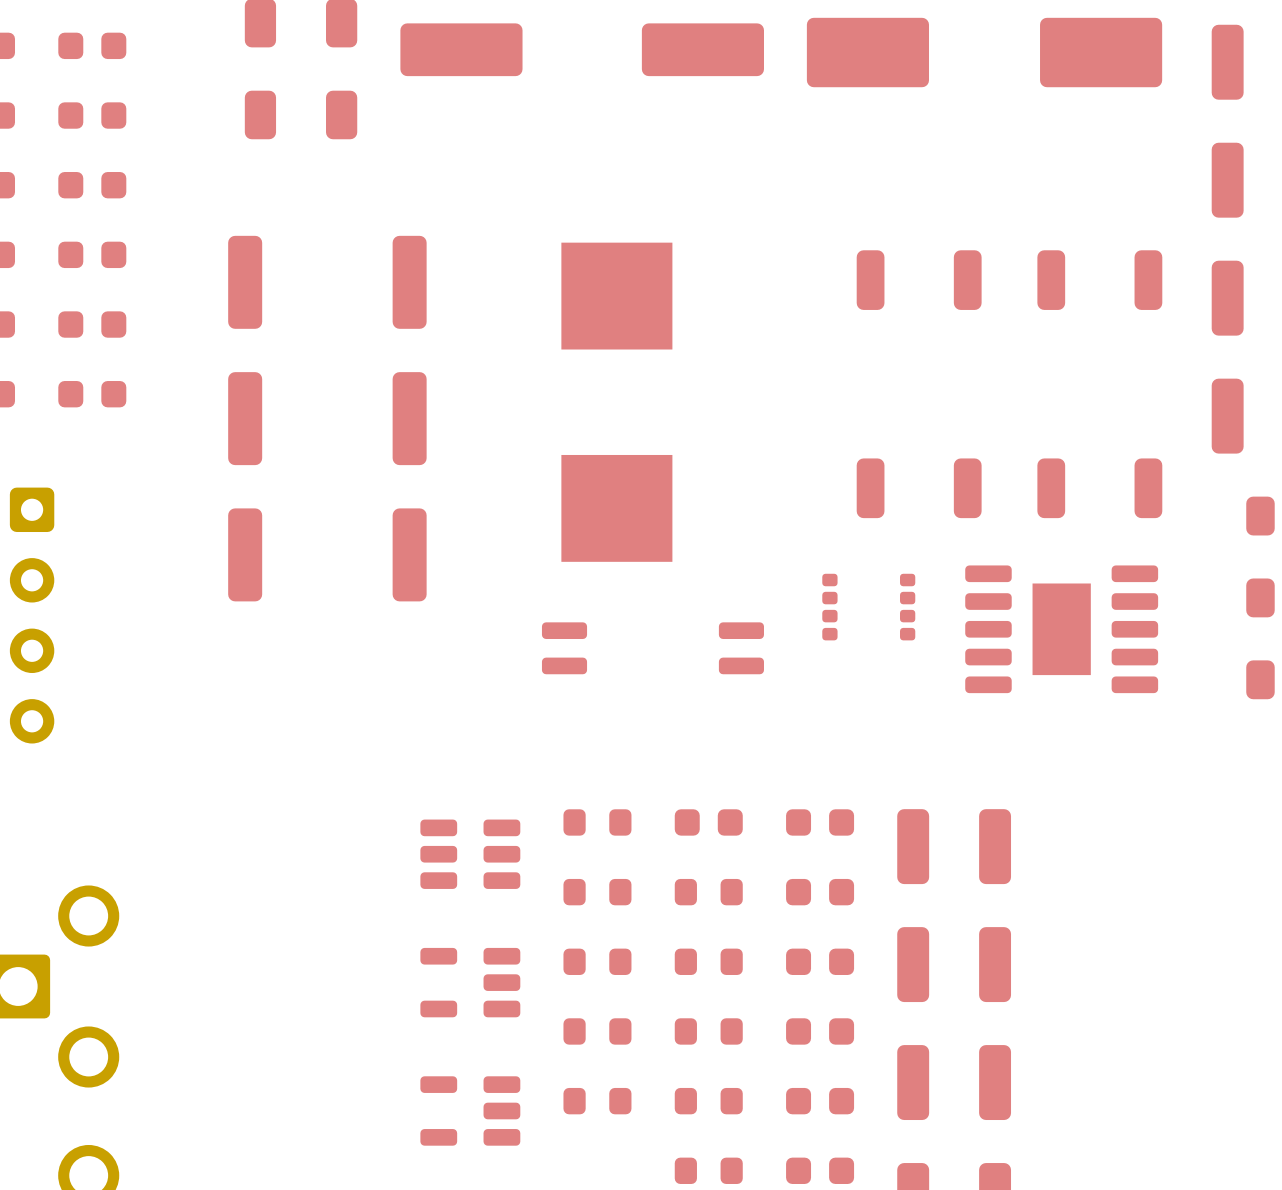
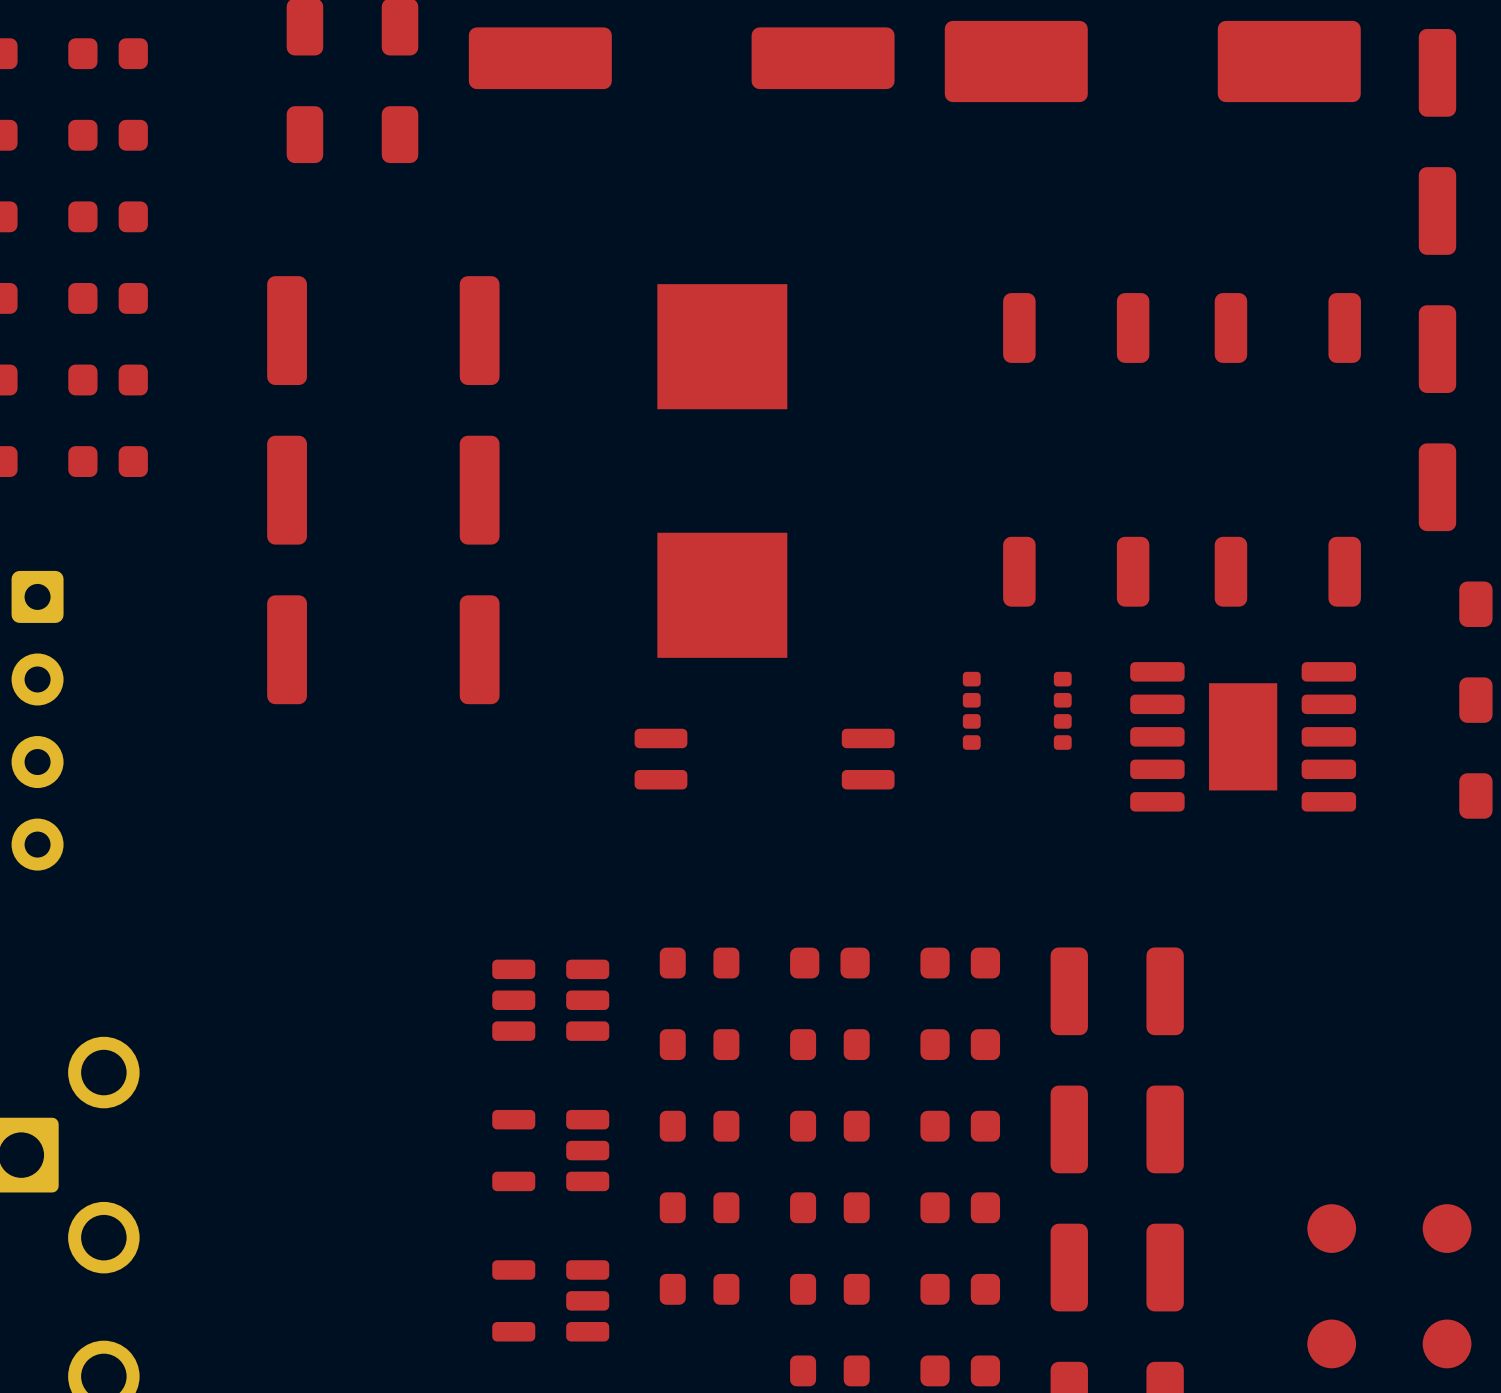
part: none -> (1331, 1228)
part: none -> (1447, 1228)
part: none -> (1331, 1343)
part: none -> (1447, 1343)

